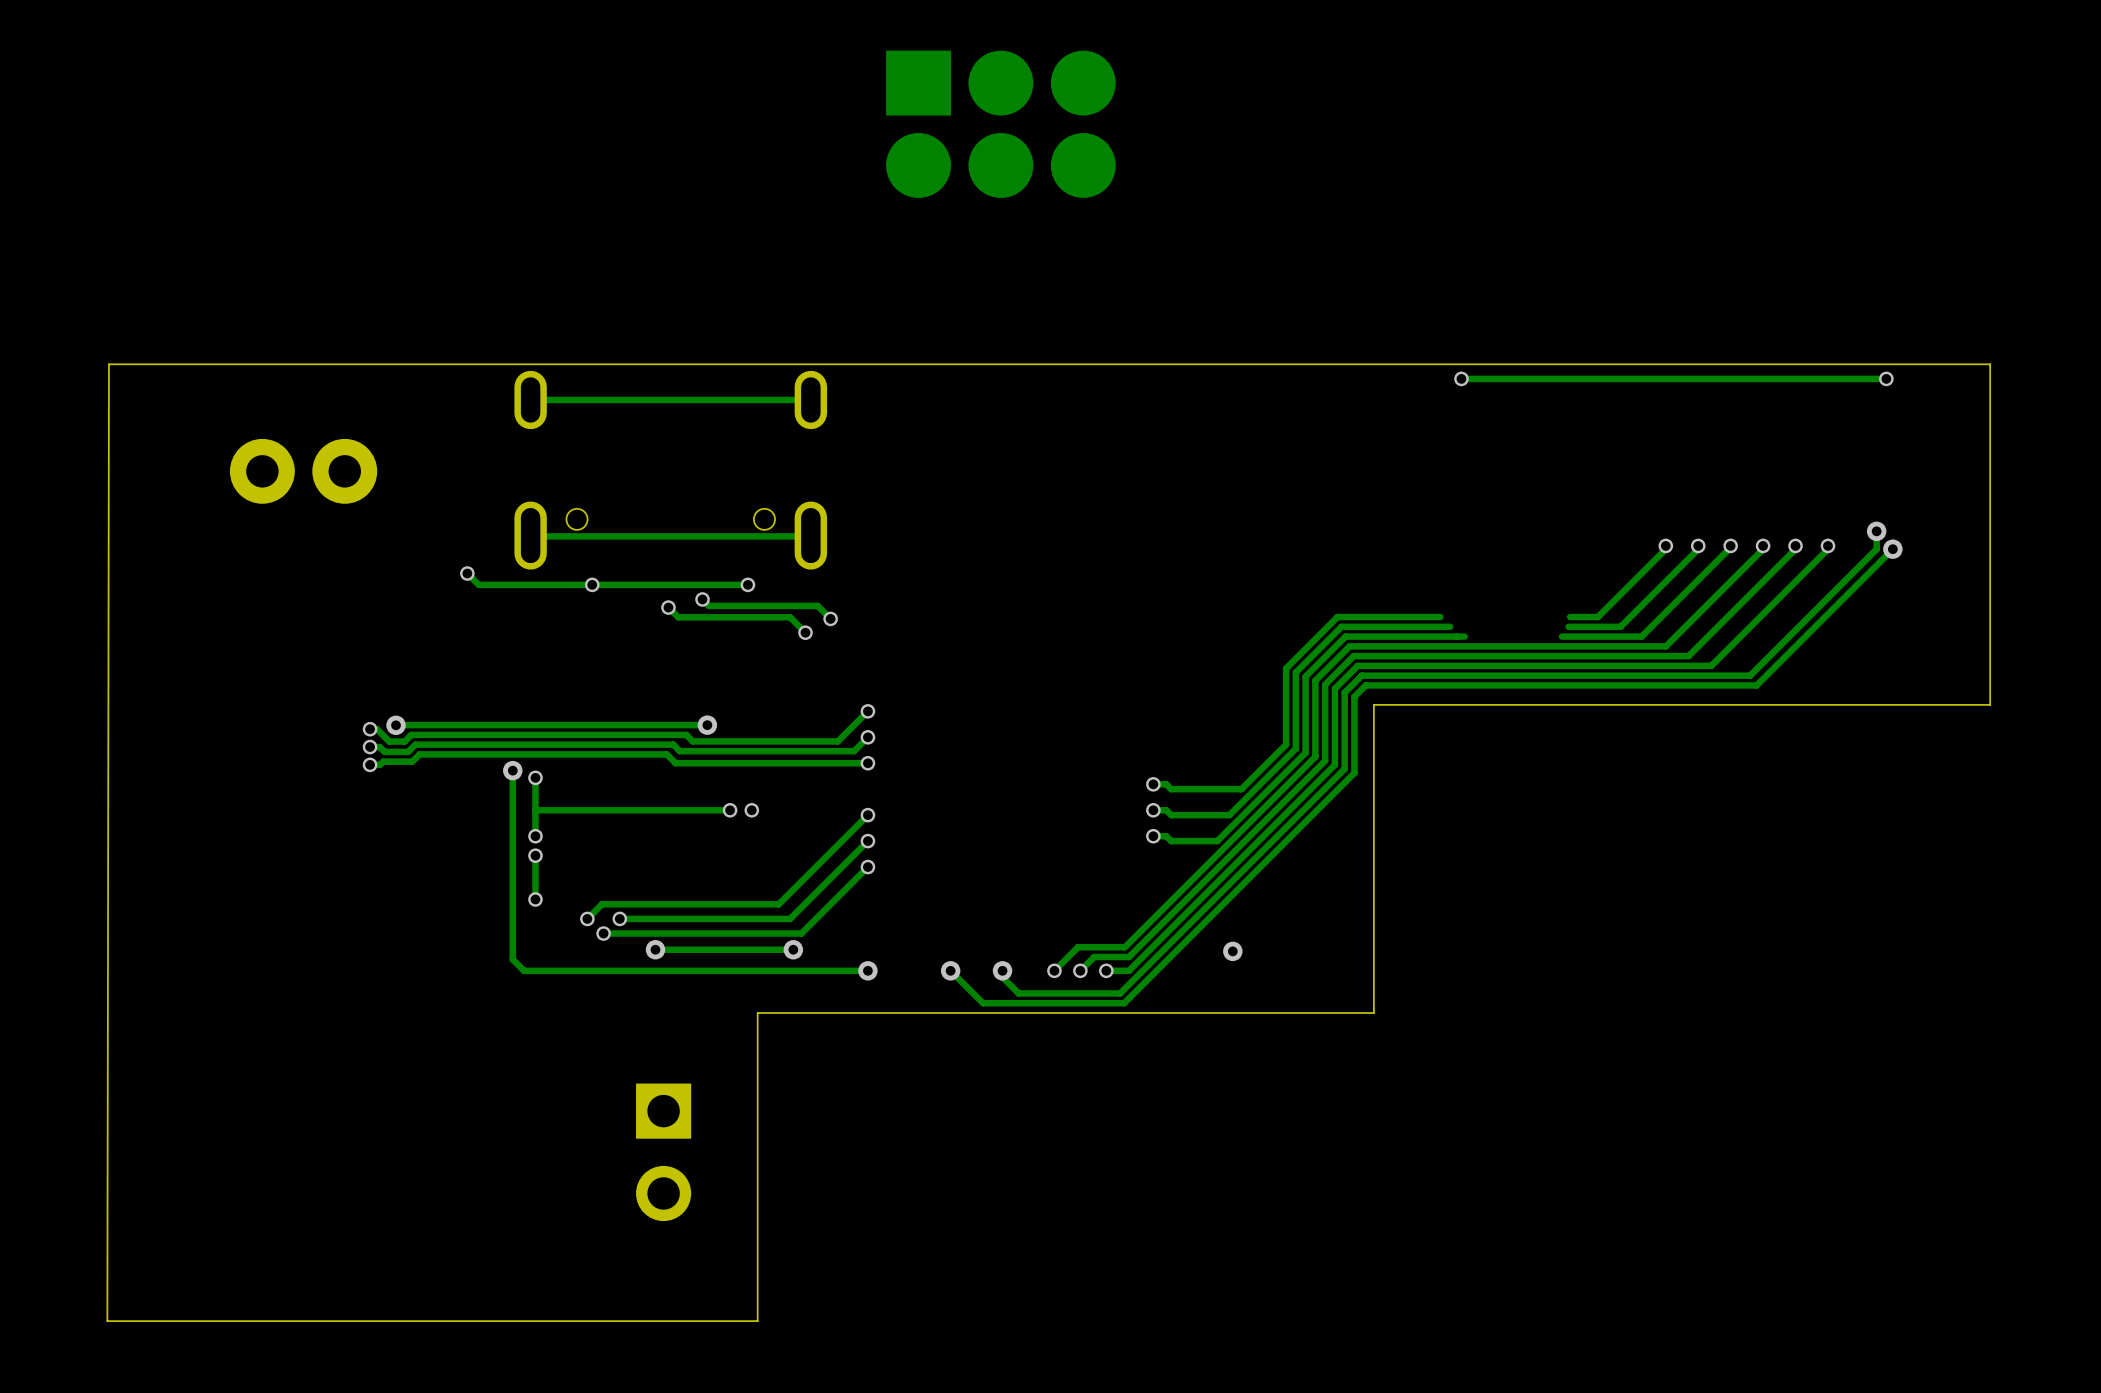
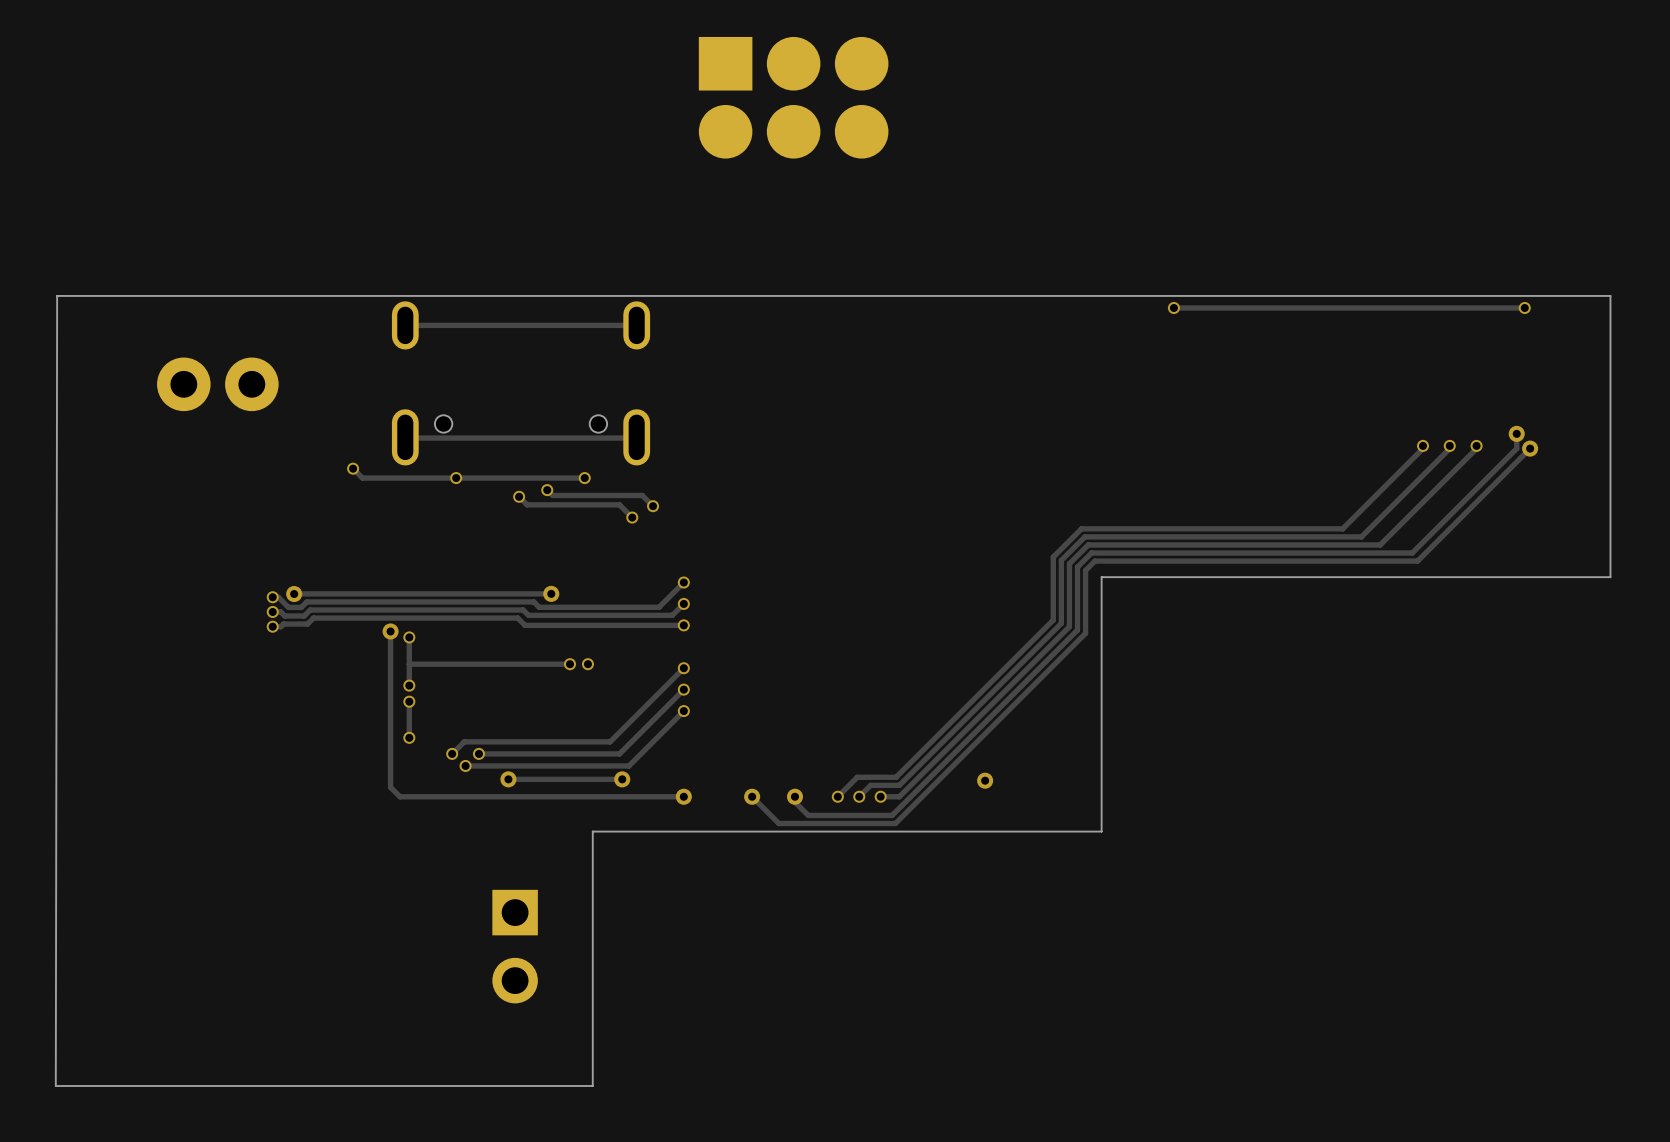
track: (1665, 545) (1665, 549) (1597, 617) (1570, 617) -> none
via: (1665, 545) -> none
track: (1698, 545) (1698, 549) (1620, 626) (1568, 626) -> none
via: (1698, 545) -> none
track: (1730, 545) (1641, 636) (1562, 636) -> none
via: (1730, 545) -> none
track: (1440, 617) (1337, 617) (1286, 668) (1286, 744) (1241, 789) (1171, 789) (1166, 784) (1153, 784) -> none
track: (1450, 626) (1341, 626) (1295, 672) (1295, 748) (1229, 815) (1171, 815) (1166, 810) (1153, 810) -> none
track: (1464, 636) (1345, 636) (1305, 676) (1305, 752) (1217, 841) (1171, 841) (1166, 836) (1153, 836) -> none
via: (1153, 784) -> none
via: (1153, 810) -> none
via: (1153, 836) -> none

